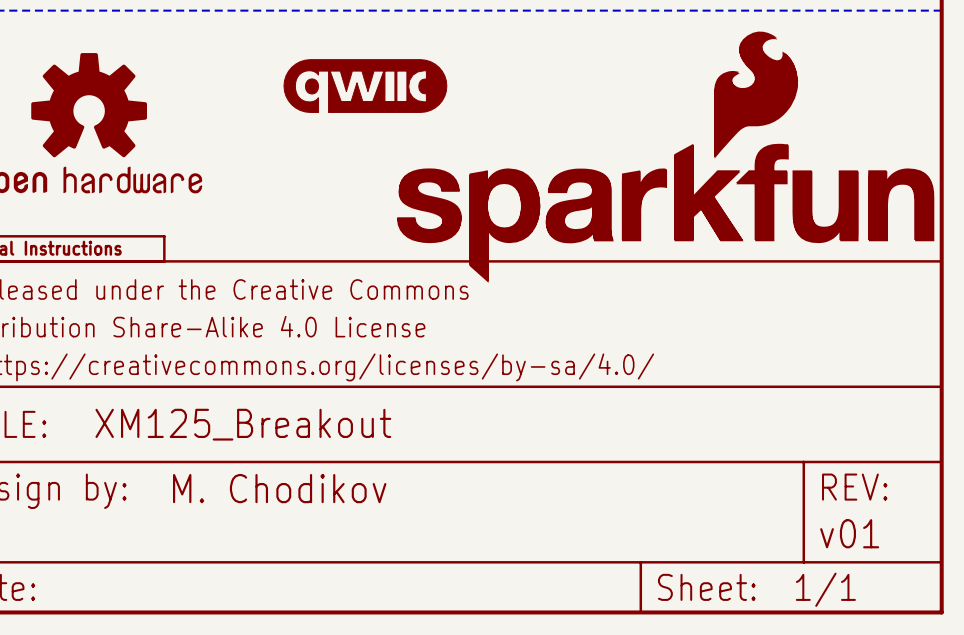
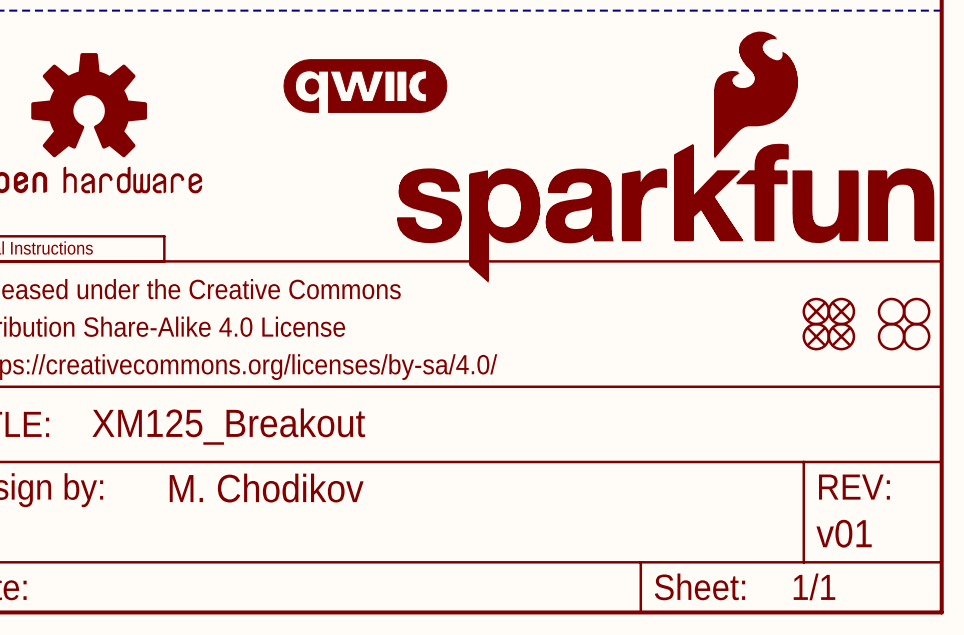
part: none -> (816, 311)
part: none -> (841, 311)
part: none -> (891, 311)
part: none -> (916, 311)
part: none -> (816, 336)
part: none -> (841, 336)
part: none -> (891, 336)
part: none -> (916, 336)

